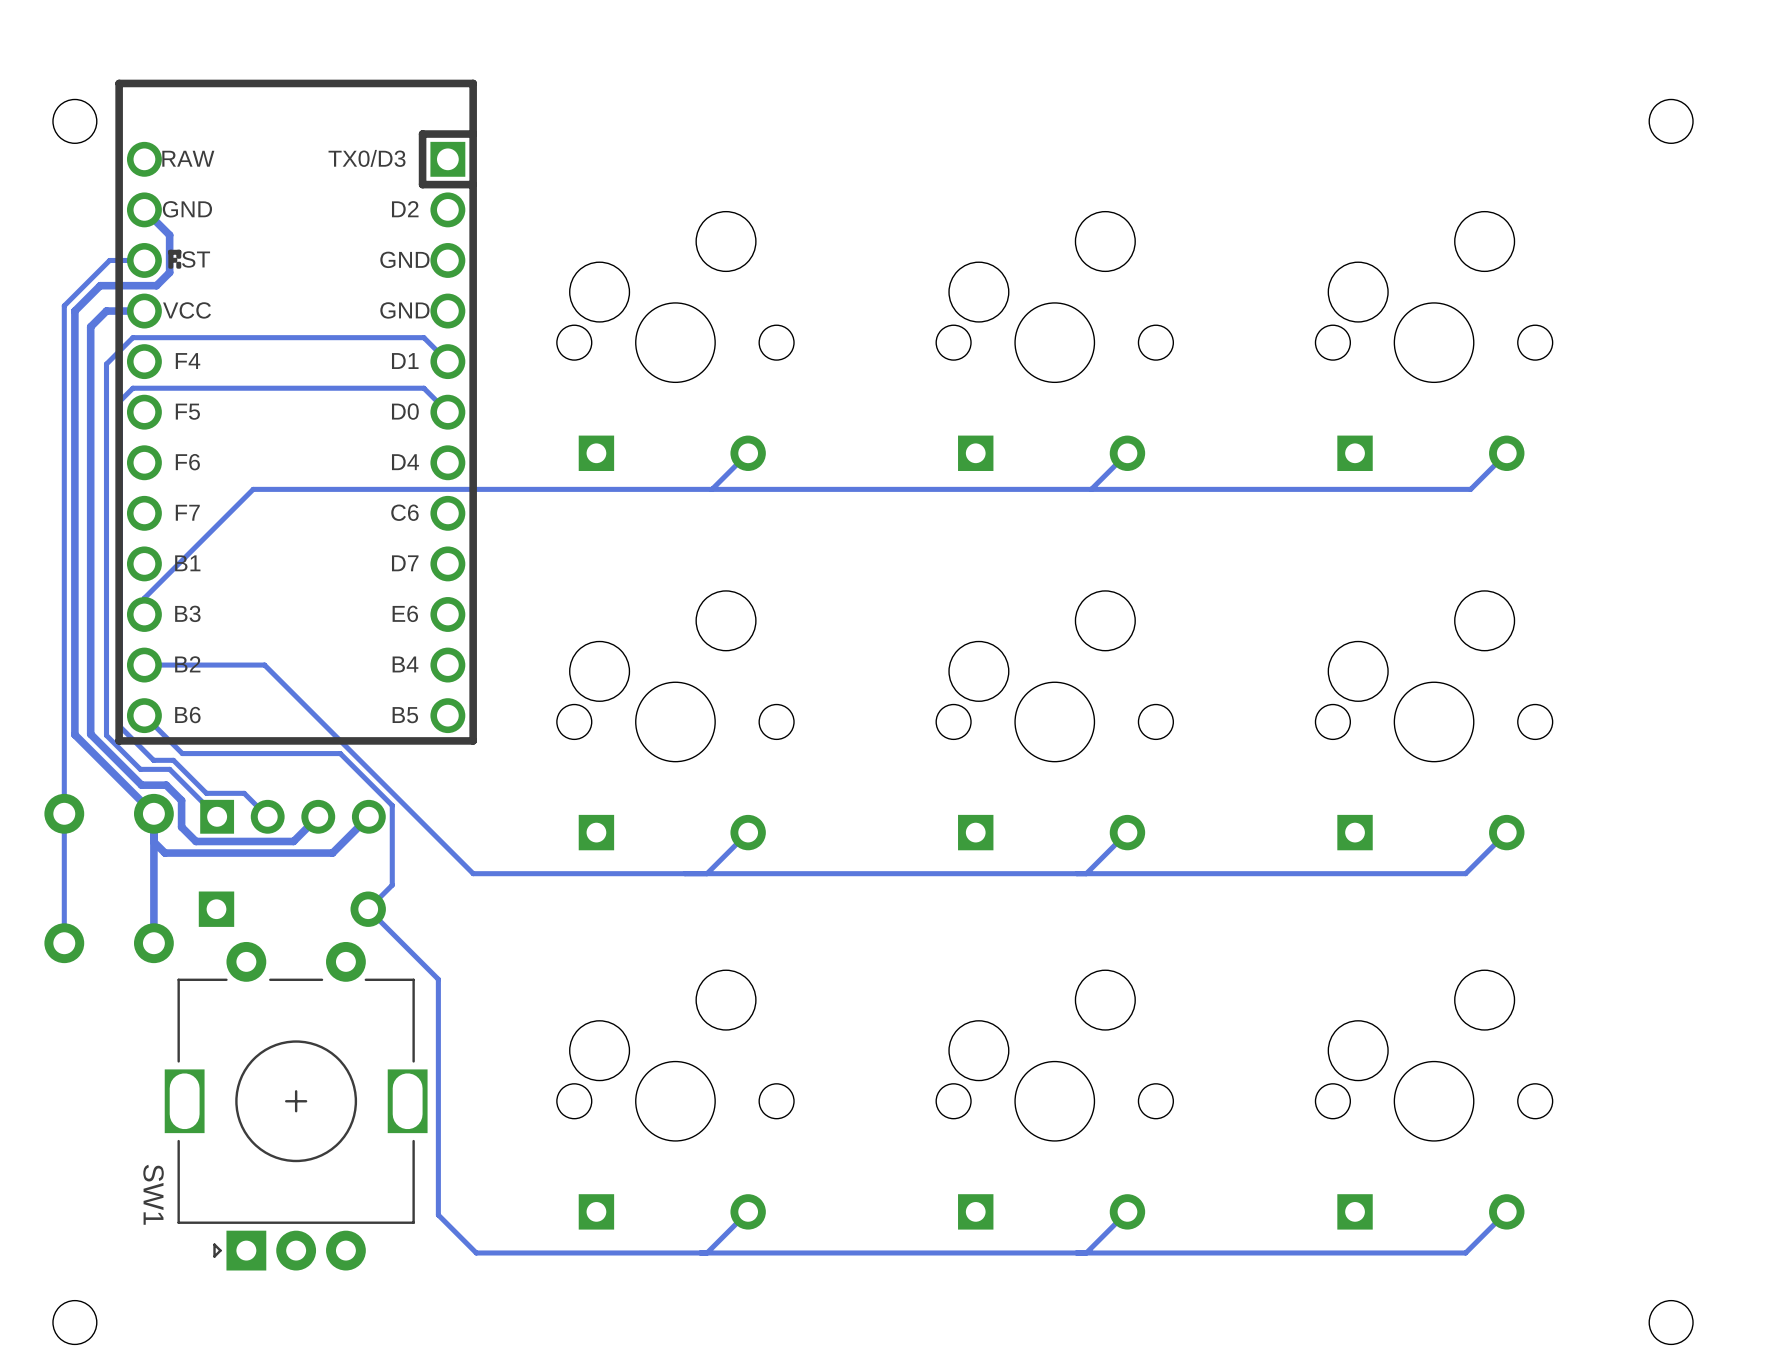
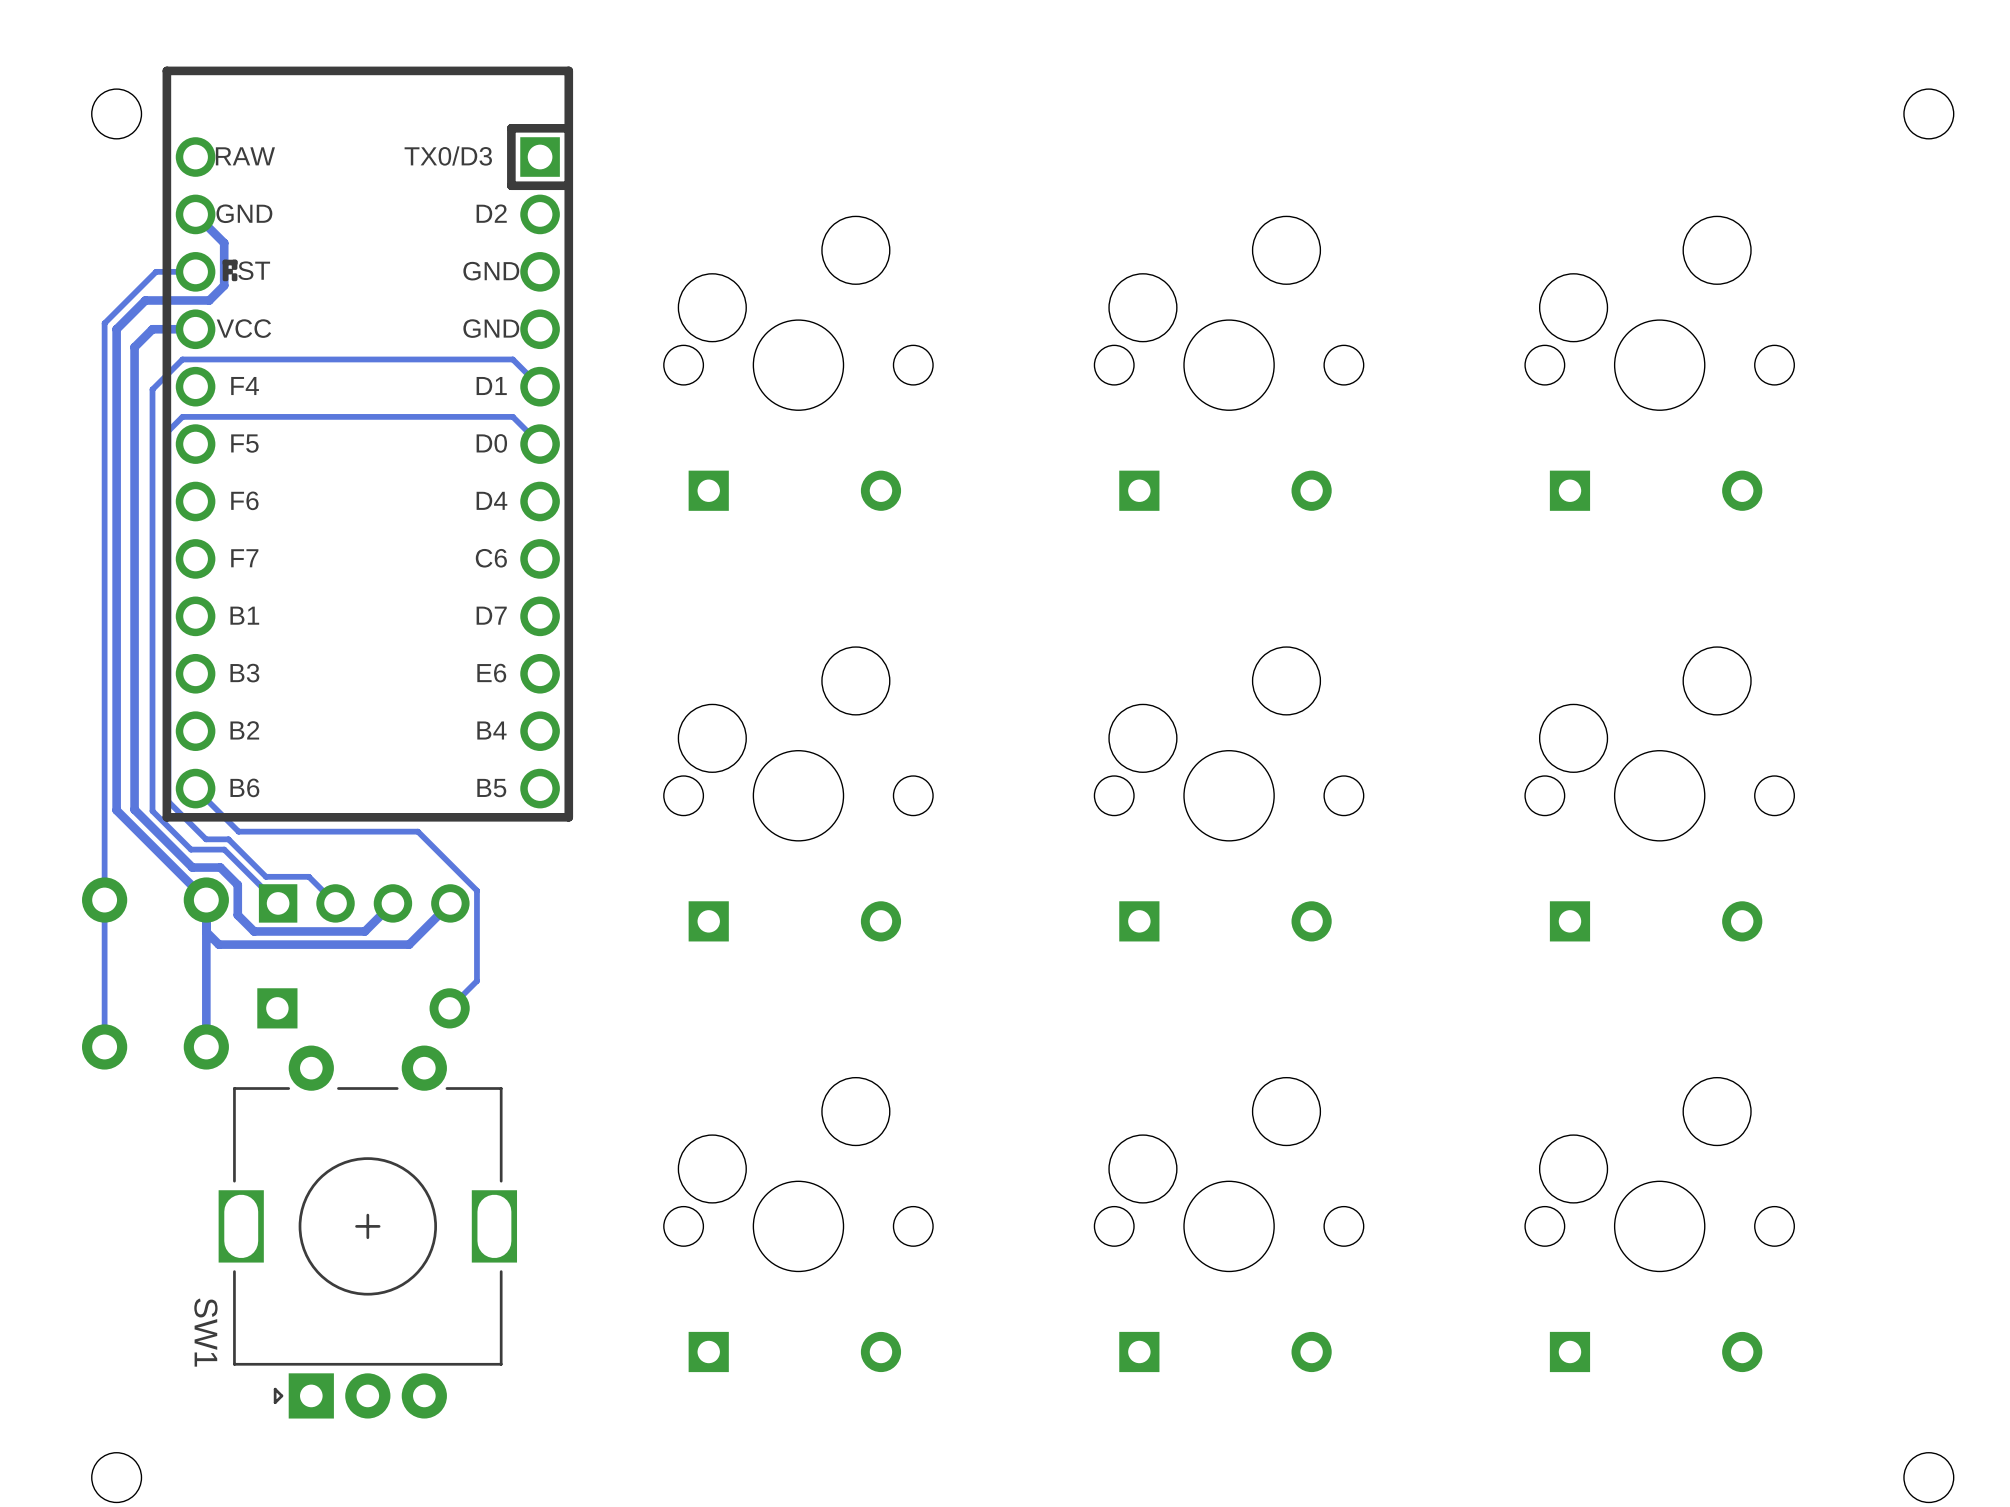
track: (748, 453) (712, 489) -> none
track: (1127, 453) (1091, 489) -> none
track: (1506, 453) (1470, 489) (253, 489) (144, 598) (144, 614) -> none
track: (144, 665) (264, 665) (473, 873) (1465, 873) (1506, 832) -> none
track: (748, 832) (707, 873) -> none
track: (1127, 832) (1086, 873) -> none
track: (368, 909) (438, 979) (438, 1215) (476, 1252) (1465, 1252) (1506, 1211) -> none
track: (748, 1211) (707, 1252) -> none
track: (1127, 1211) (1086, 1252) -> none

